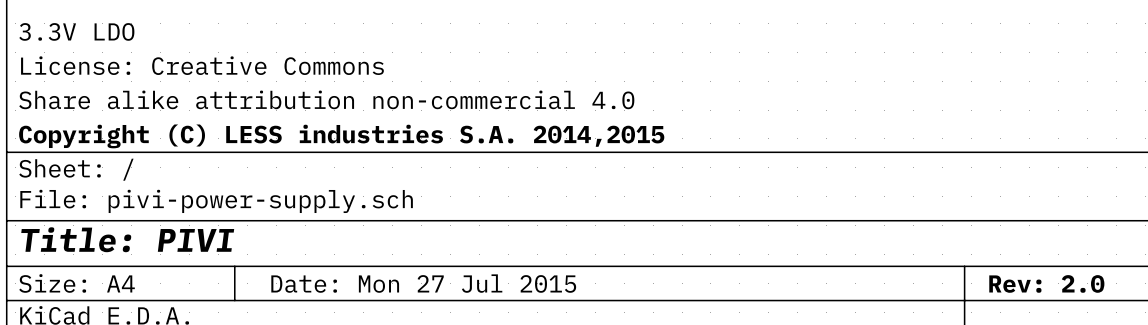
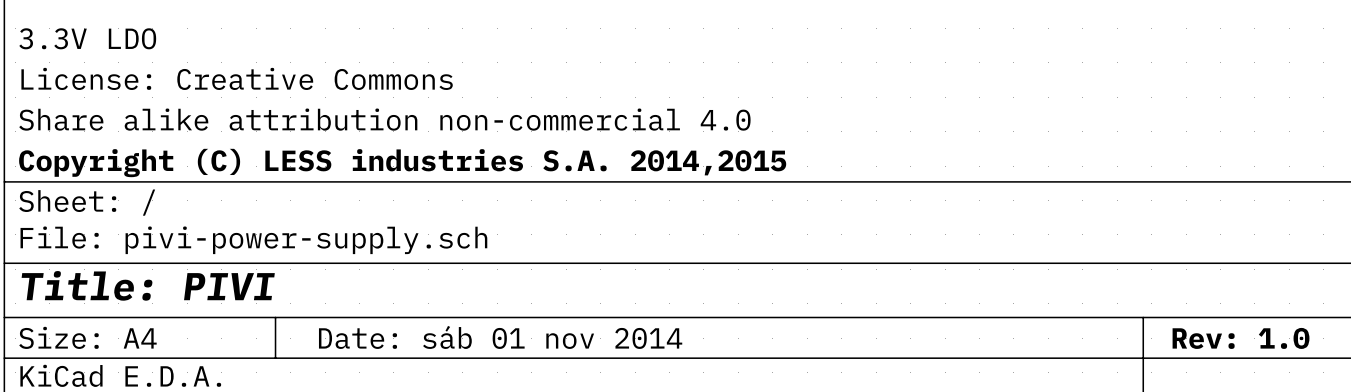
title block: Date: Mon 27 Jul 2015 (423, 283) -> Date: sáb 01 nov 2014 (500, 337)
title block: Rev: 2.0 (1046, 283) -> Rev: 1.0 (1241, 338)

